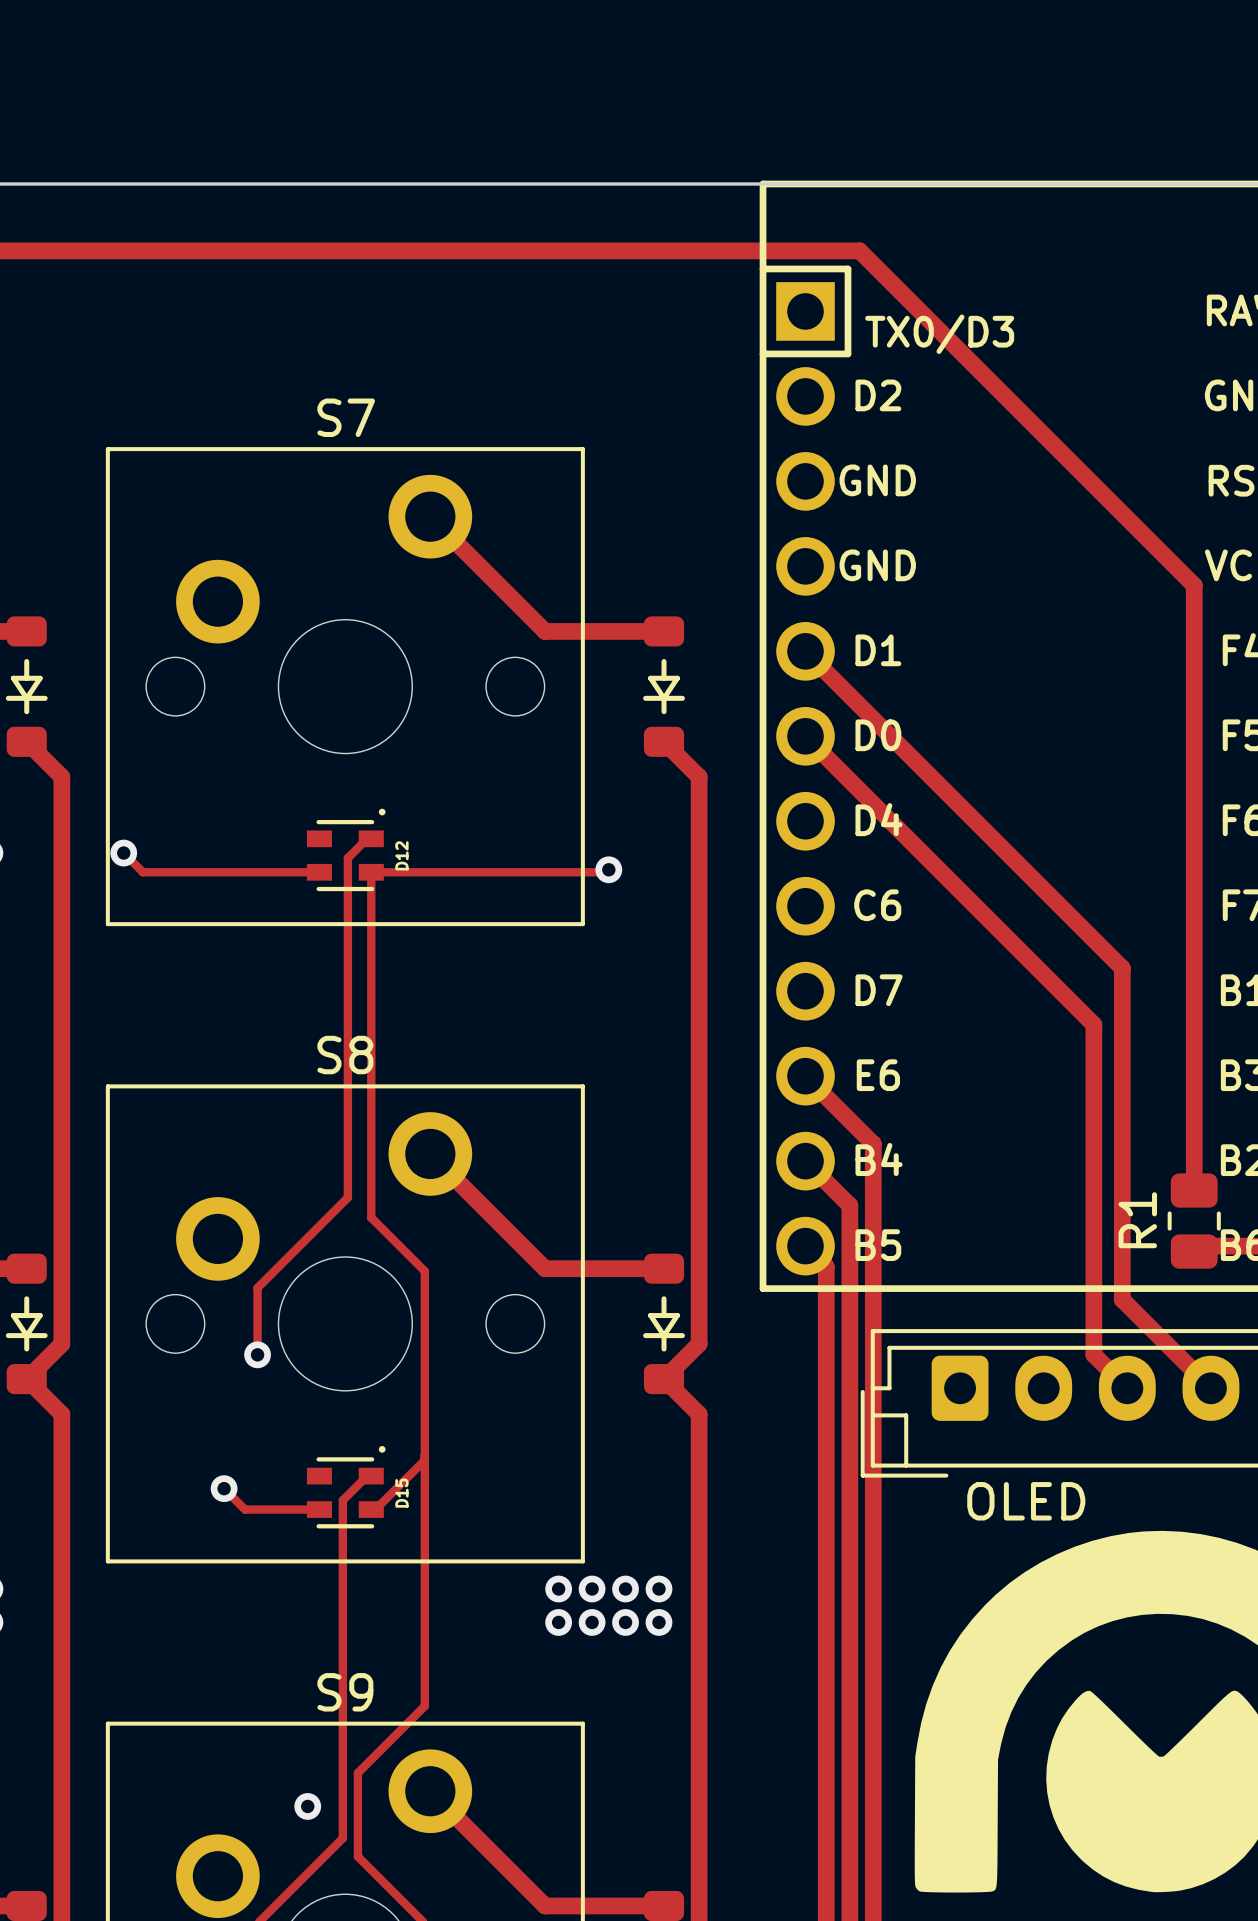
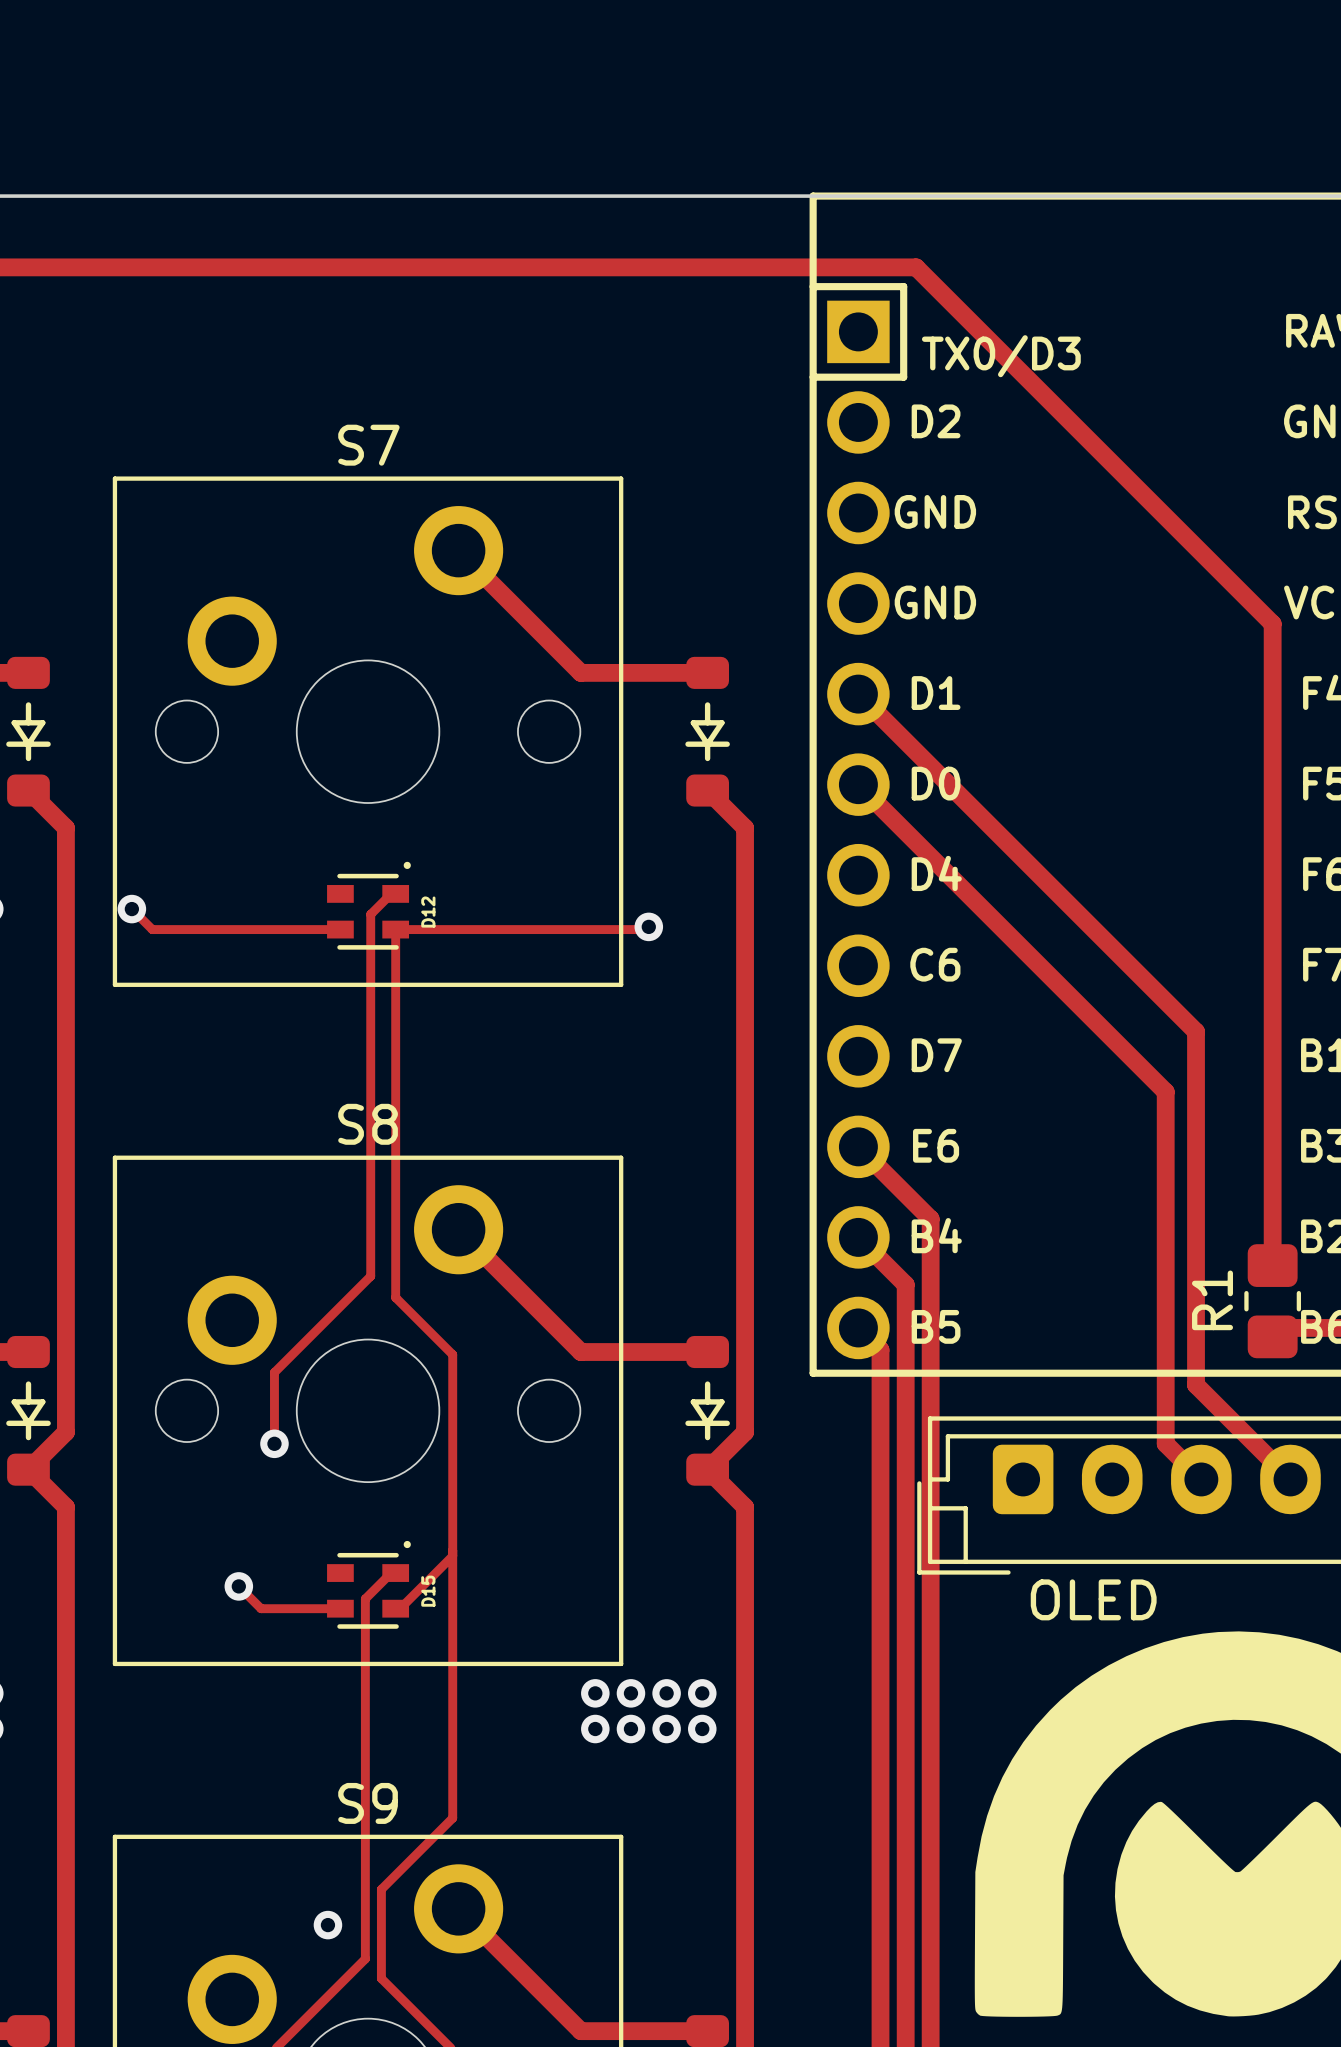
R1 footprint: [1167, 1173, 1221, 1269] -> [1244, 1244, 1302, 1359]

